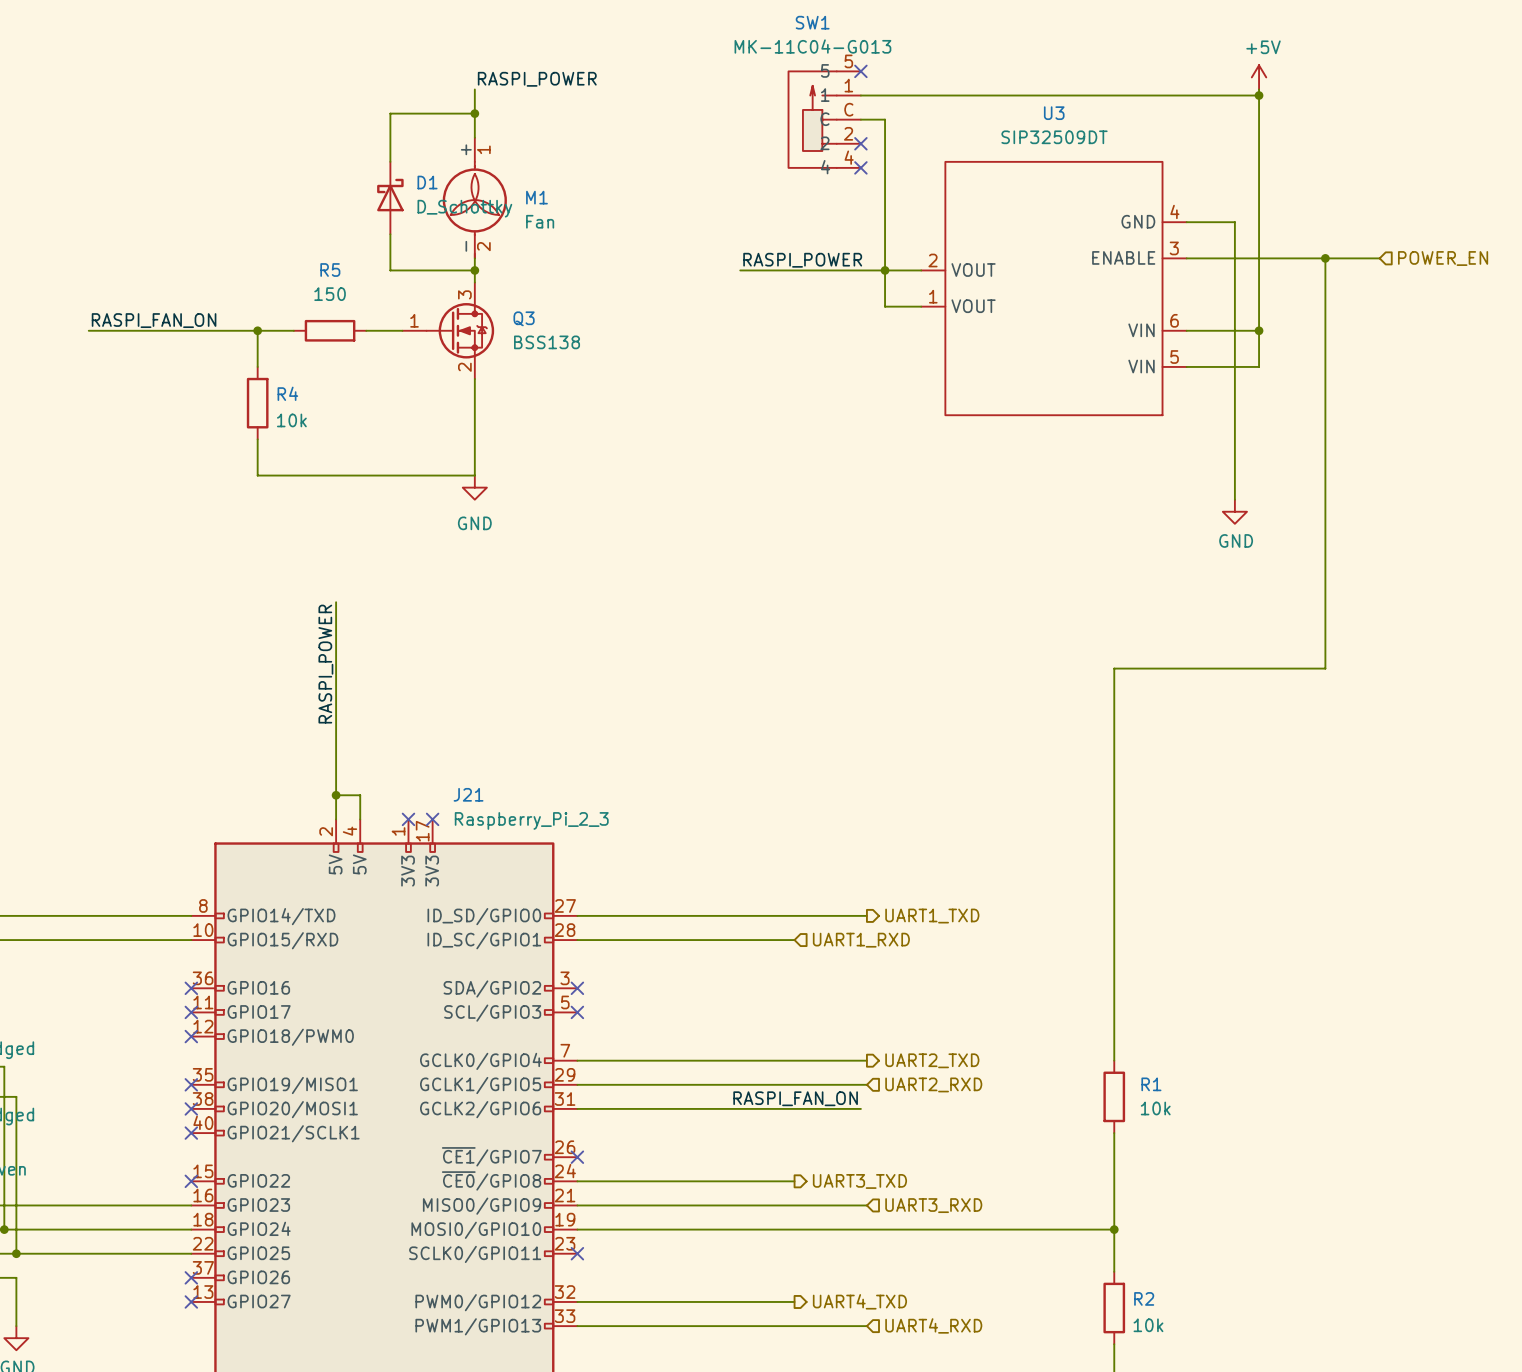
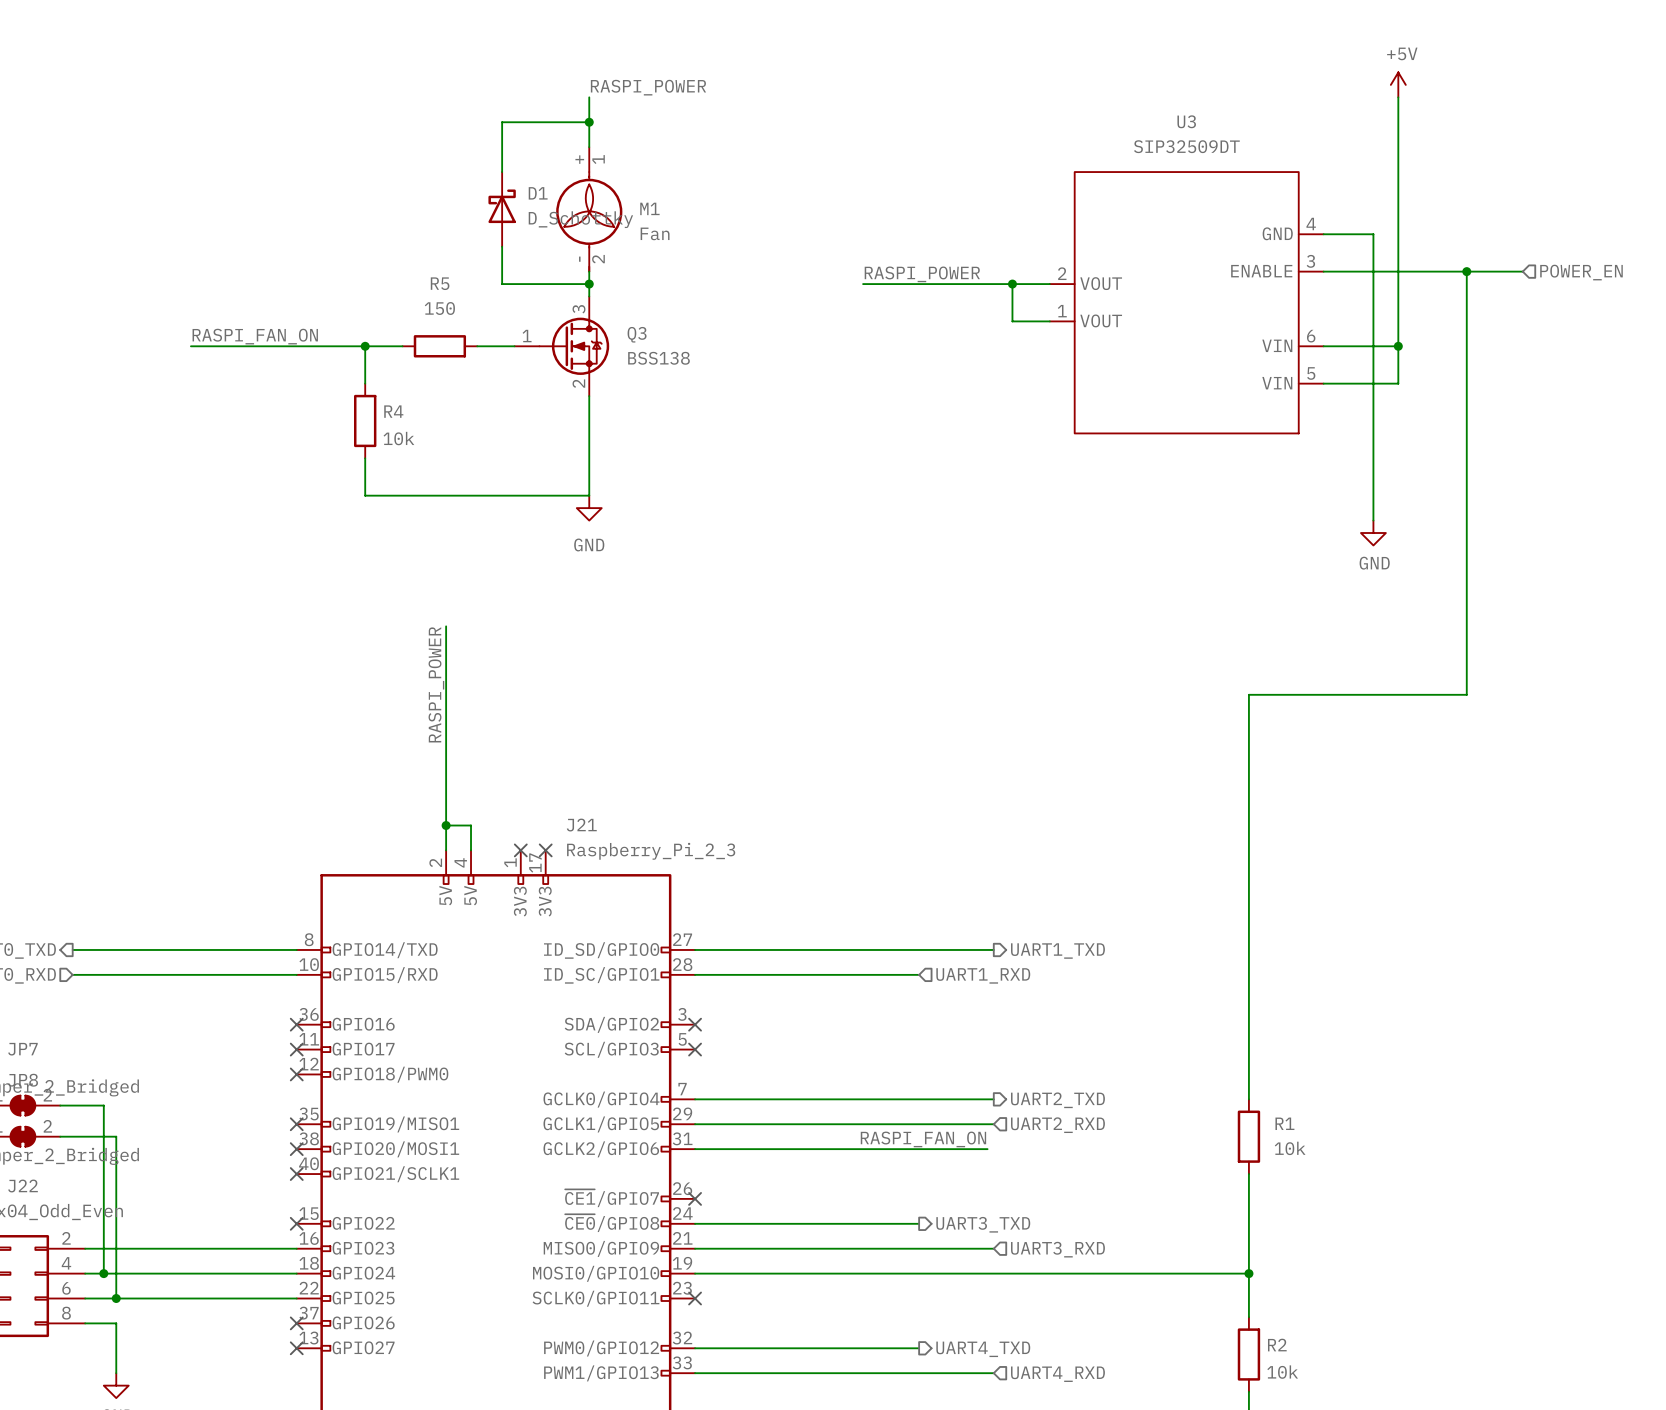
no-connect mark: (860, 71) -> none
wire: (860, 95) (1259, 95) -> none
junction: (1259, 95) -> none
SW1: MK-11C04-G013 (824, 119) -> none
wire: (860, 119) (885, 119) (885, 270) -> none
no-connect mark: (860, 143) -> none
no-connect mark: (860, 167) -> none

